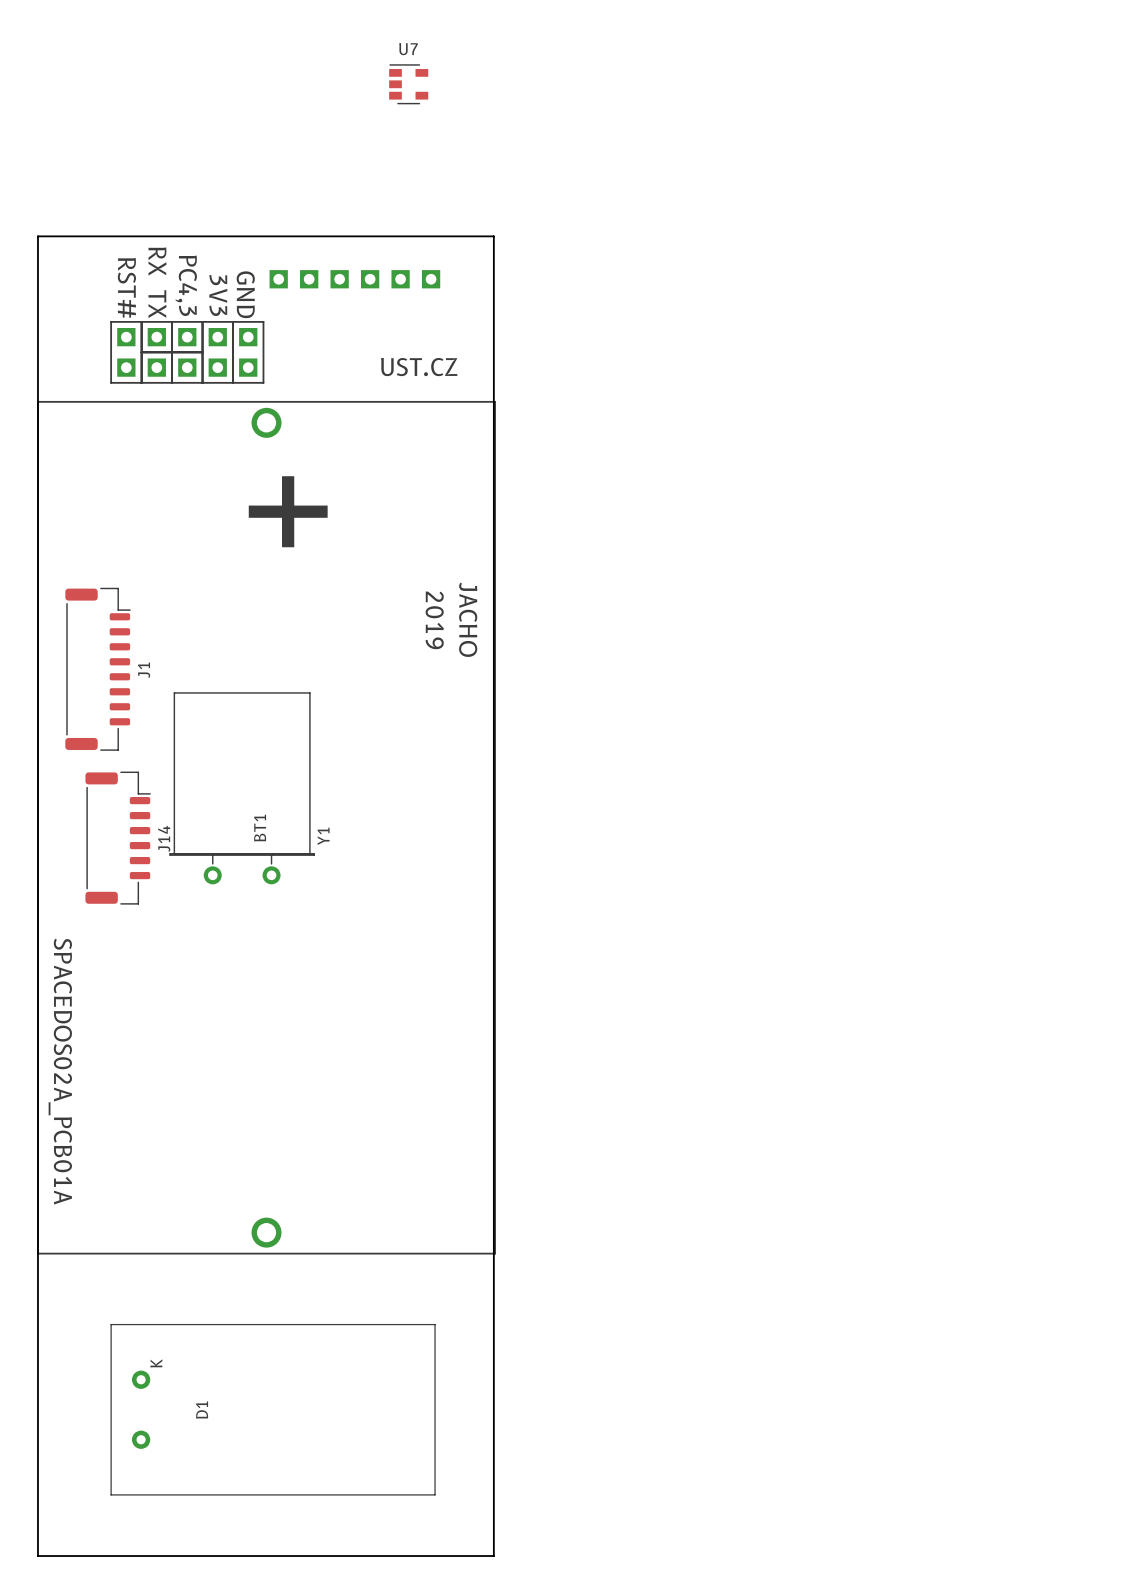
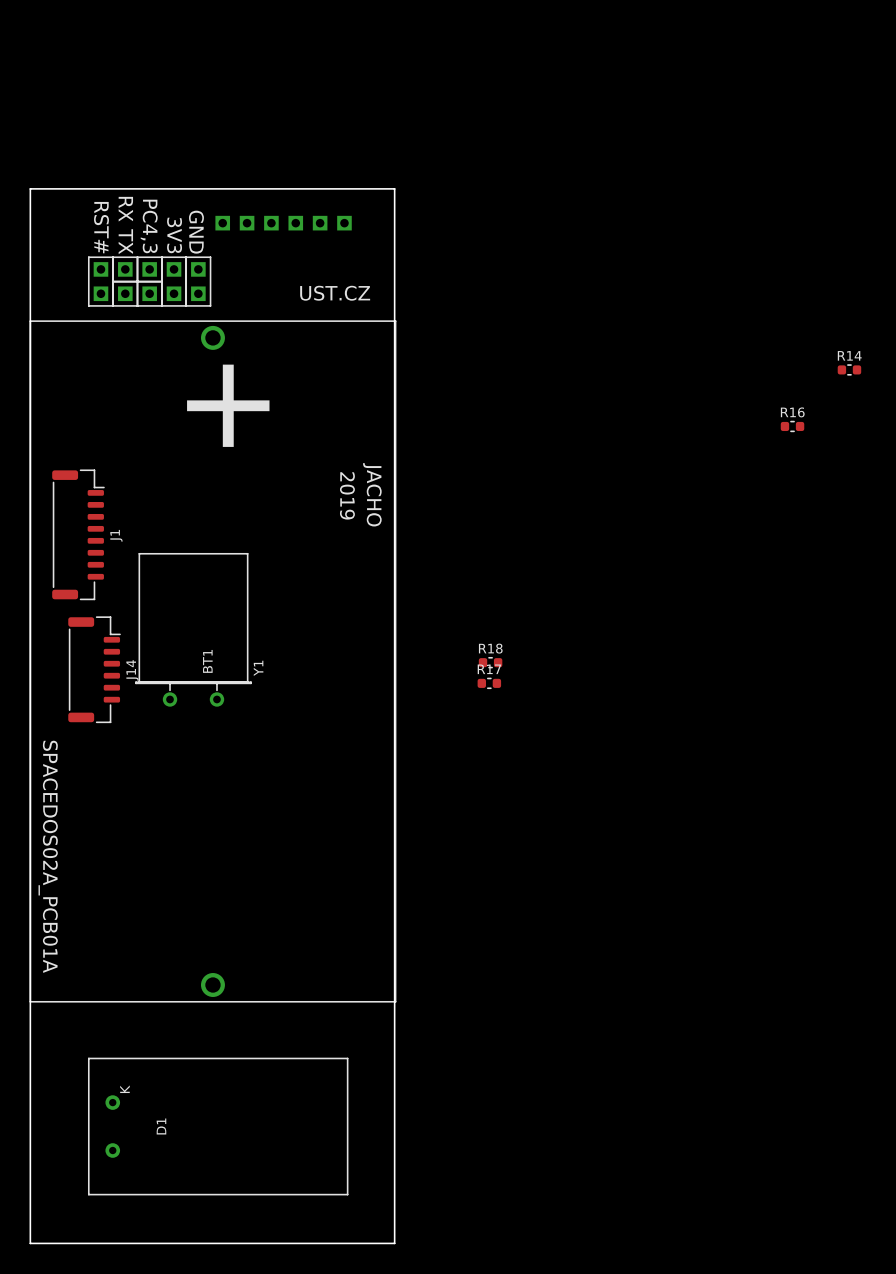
U7: (408, 84) -> none
R14: none -> (849, 369)
R16: none -> (792, 426)
R18: none -> (490, 662)
R17: none -> (489, 683)

